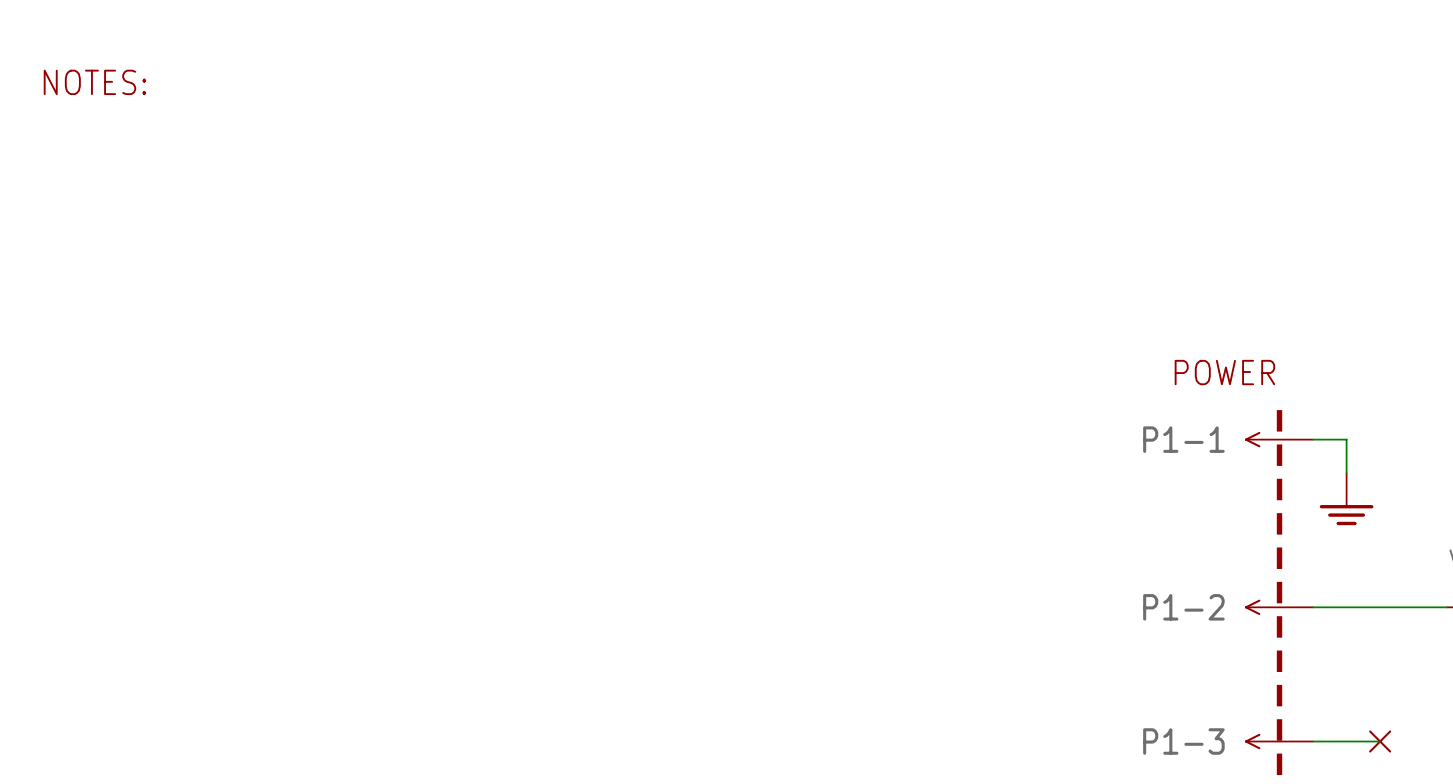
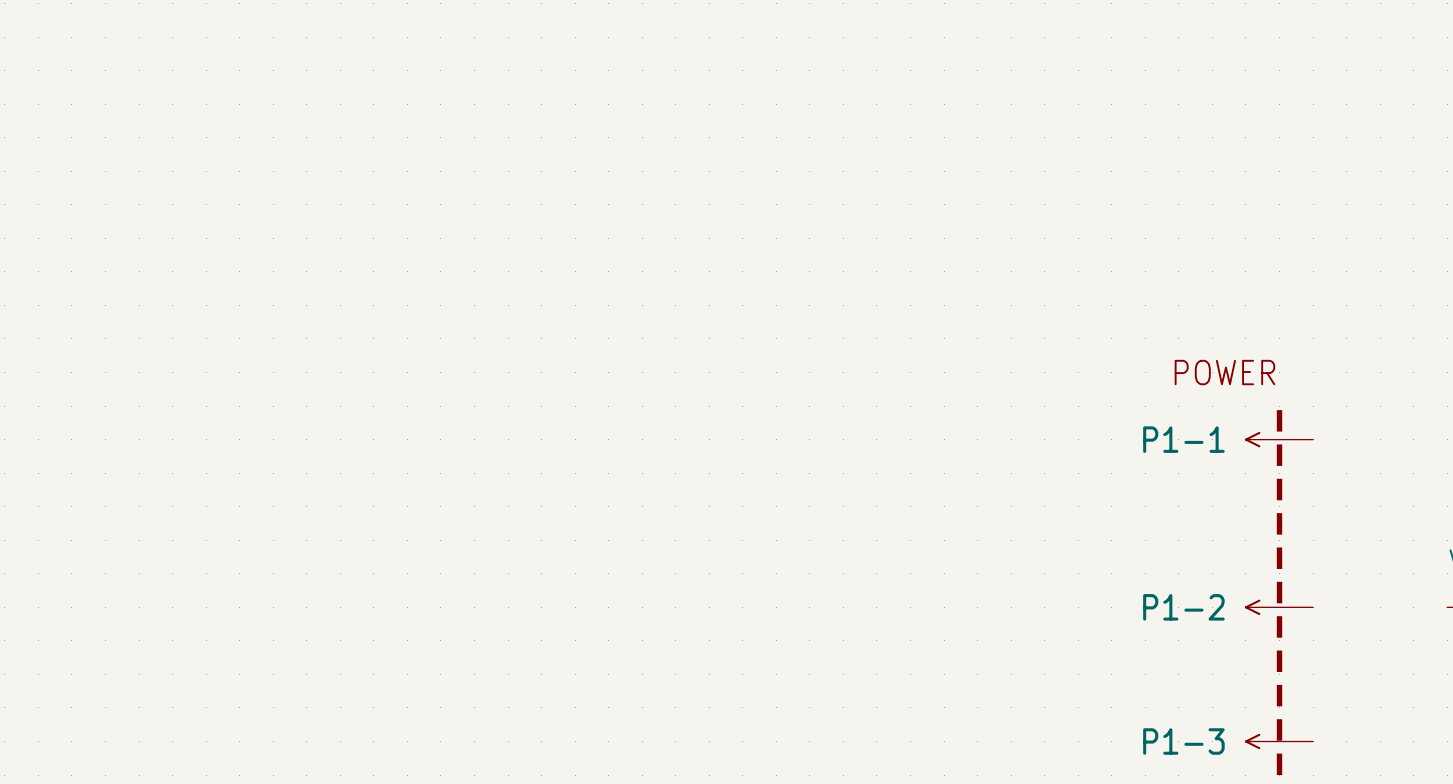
text: NOTES: (94, 82) -> none
wire: (1313, 439) (1346, 439) (1346, 473) -> none
power symbol: (1346, 499) -> none
wire: (1313, 607) (1447, 607) -> none
wire: (1313, 741) (1380, 741) -> none
part: (1380, 741) -> none

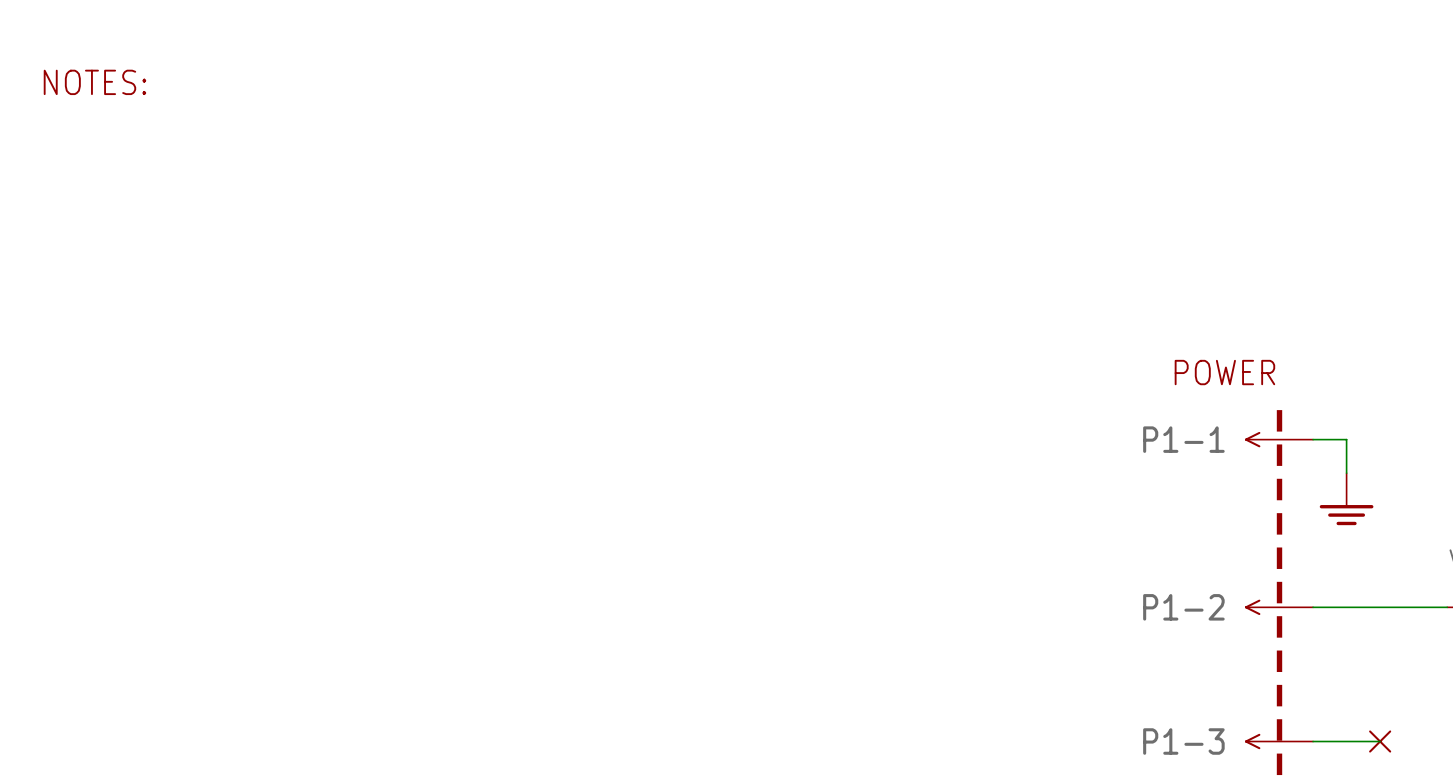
text: none -> NOTES: (94, 82)
wire: none -> (1313, 439) (1346, 439) (1346, 473)
power symbol: none -> (1346, 499)
wire: none -> (1313, 607) (1447, 607)
wire: none -> (1313, 741) (1380, 741)
part: none -> (1380, 741)

